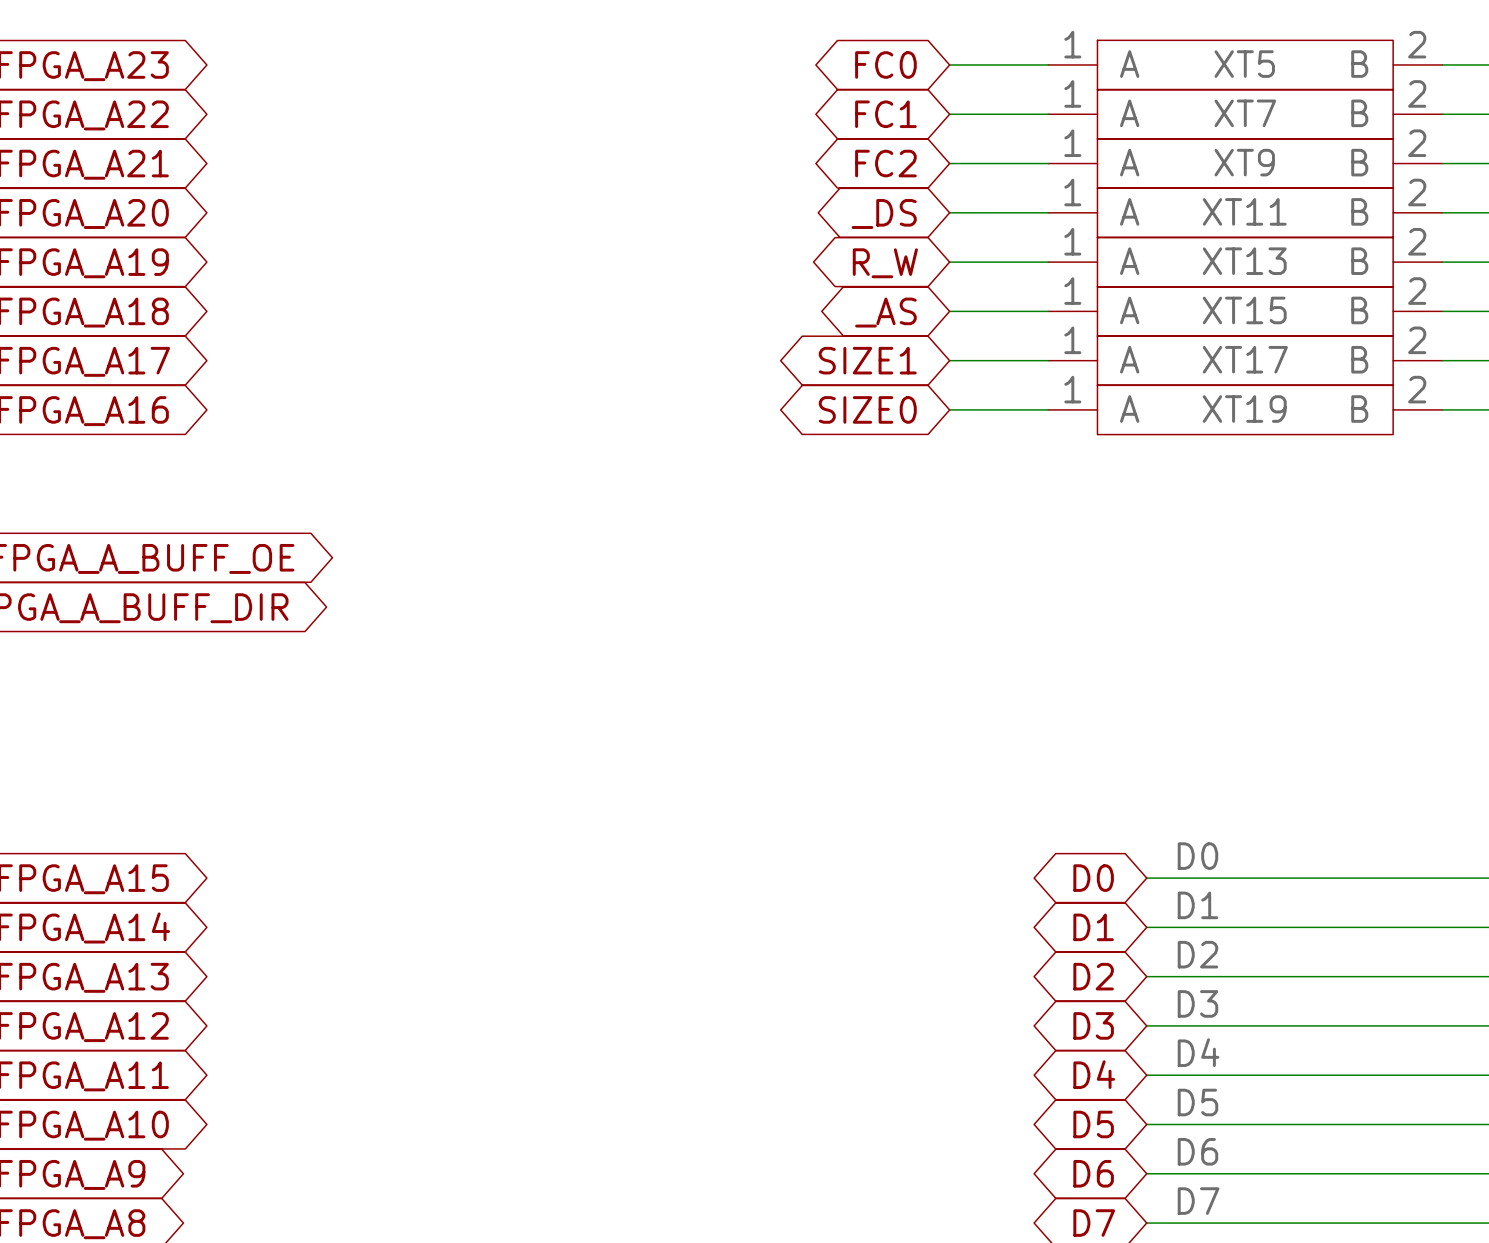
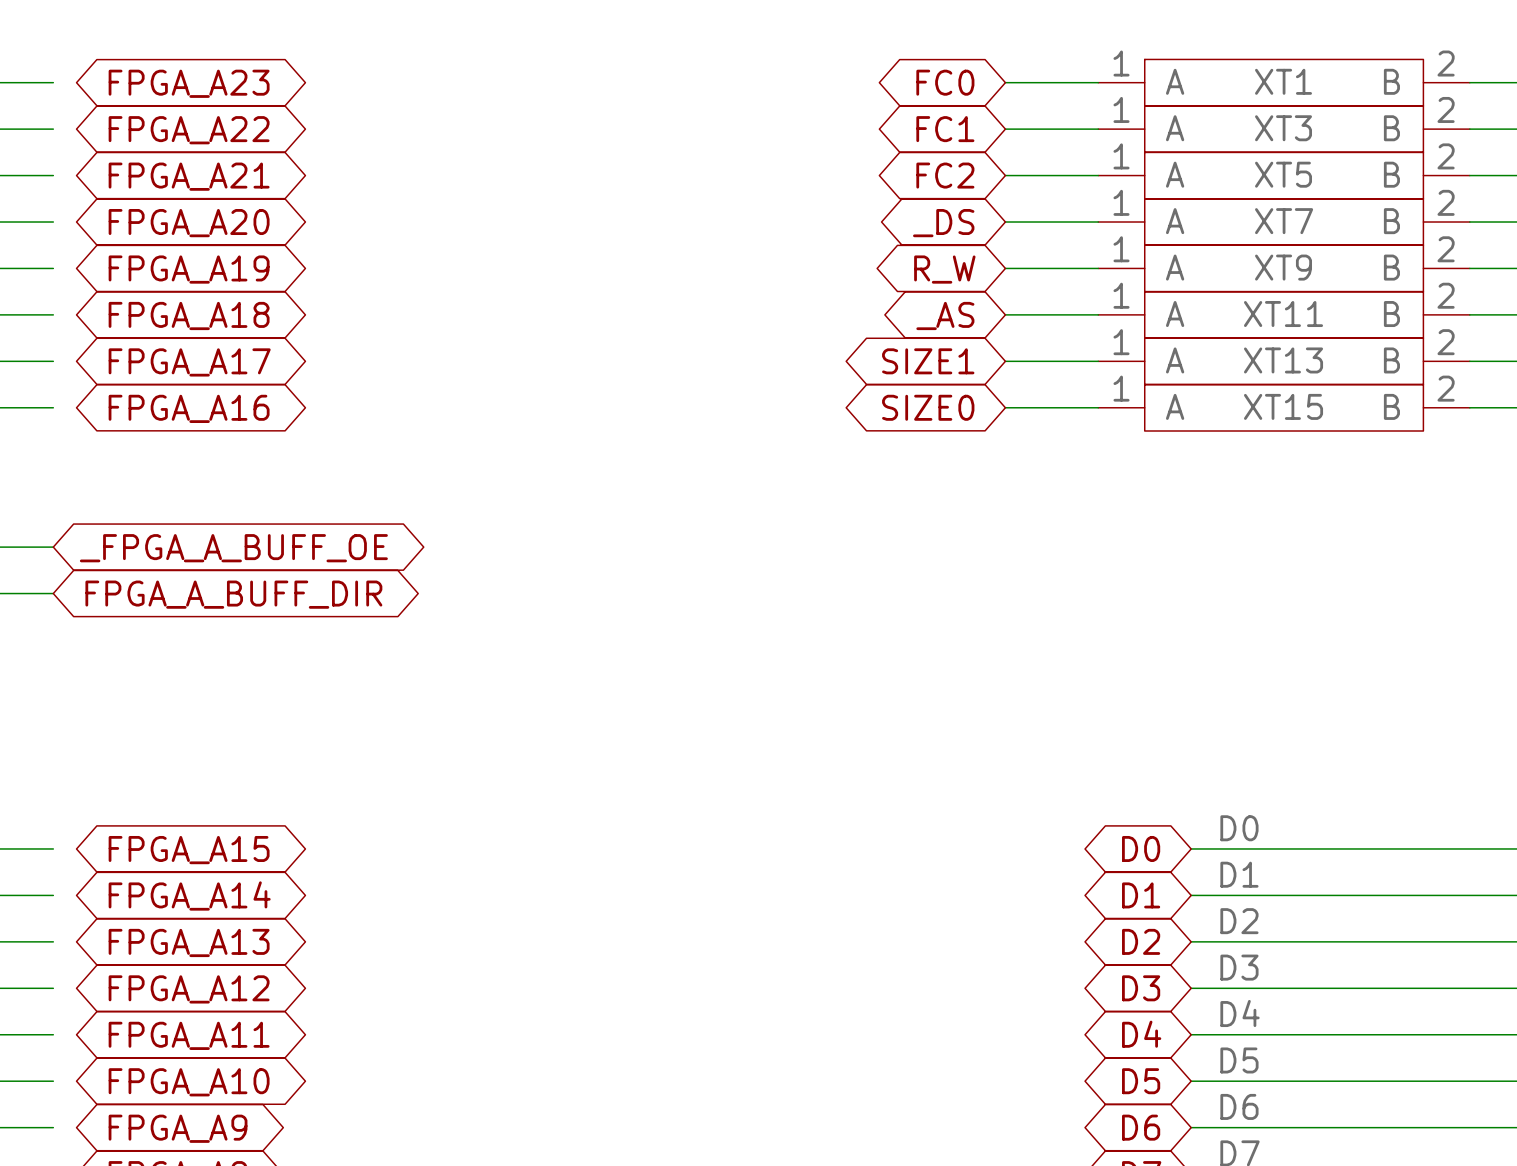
XT5 name: XT5 (1244, 64) -> XT1 (1283, 81)
XT7 name: XT7 (1245, 113) -> XT3 (1283, 128)
XT9 name: XT9 (1244, 162) -> XT5 (1283, 174)
XT11 name: XT11 (1244, 211) -> XT7 (1284, 221)
XT13 name: XT13 (1244, 261) -> XT9 (1283, 267)
XT15 name: XT15 (1244, 310) -> XT11 (1283, 314)
XT17 name: XT17 (1245, 359) -> XT13 (1283, 360)
XT19 name: XT19 (1244, 409) -> XT15 (1283, 406)

